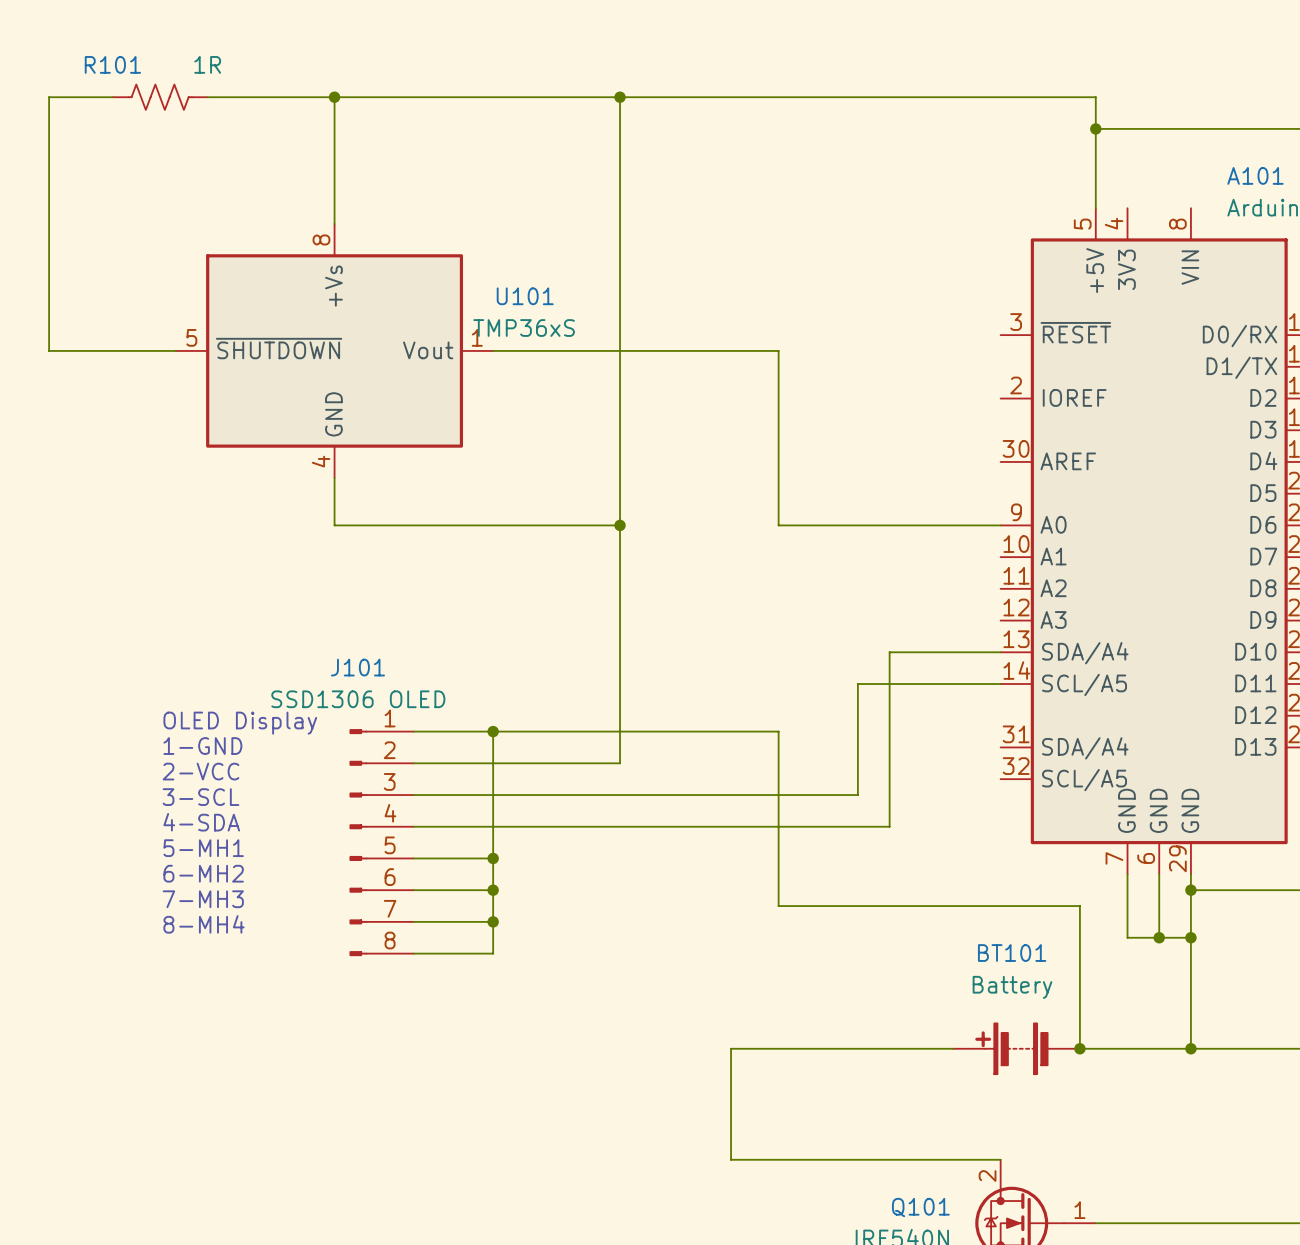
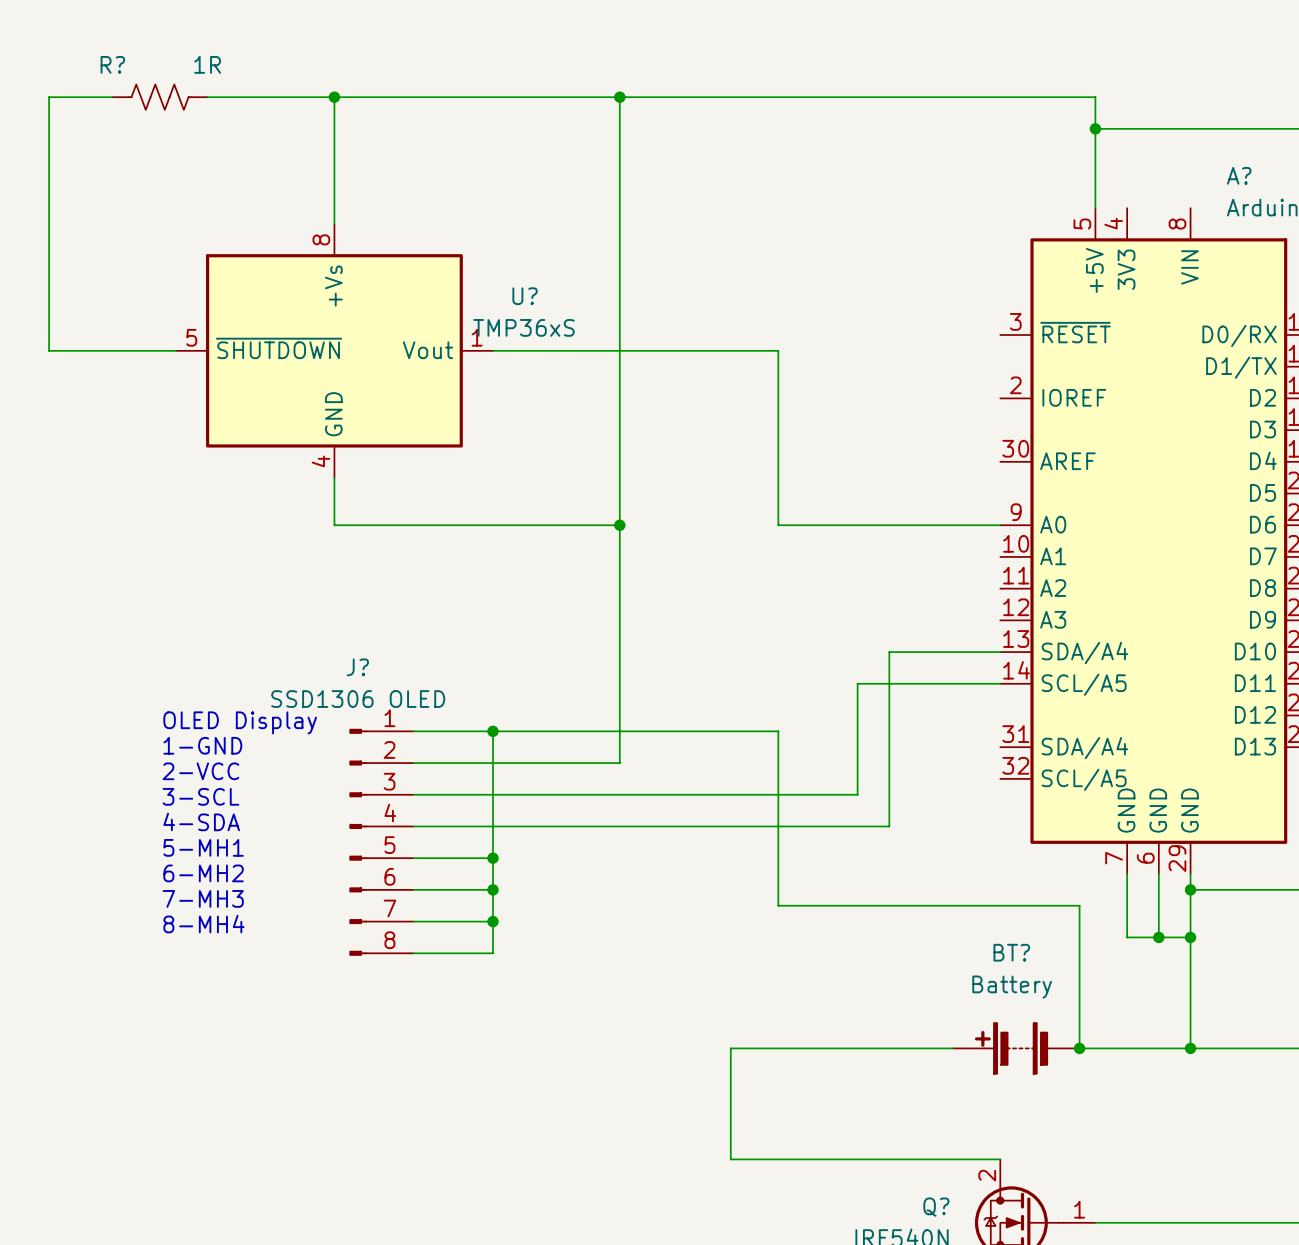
R101 name: R101 (112, 64) -> R? (112, 64)
A101 name: A101 (1255, 175) -> A? (1239, 175)
U101 name: U101 (525, 296) -> U? (525, 296)
J101 name: J101 (357, 667) -> J? (357, 667)
BT101 name: BT101 (1012, 953) -> BT? (1011, 952)
Q101 name: Q101 (920, 1207) -> Q? (936, 1207)

